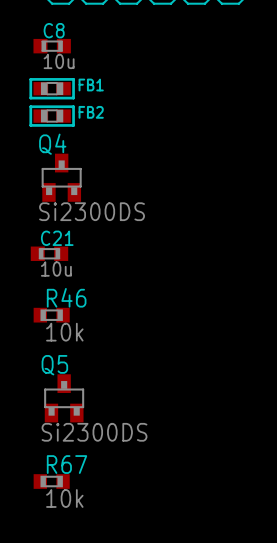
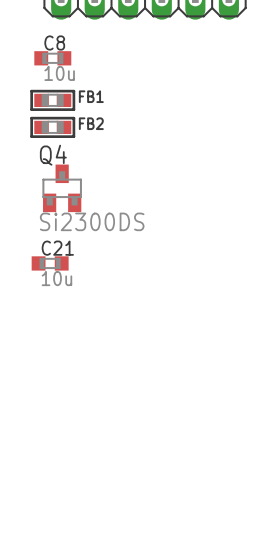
R46: 10k (51, 315) -> none
Q5: Si2300DS (64, 398) -> none
R67: 10k (51, 481) -> none

